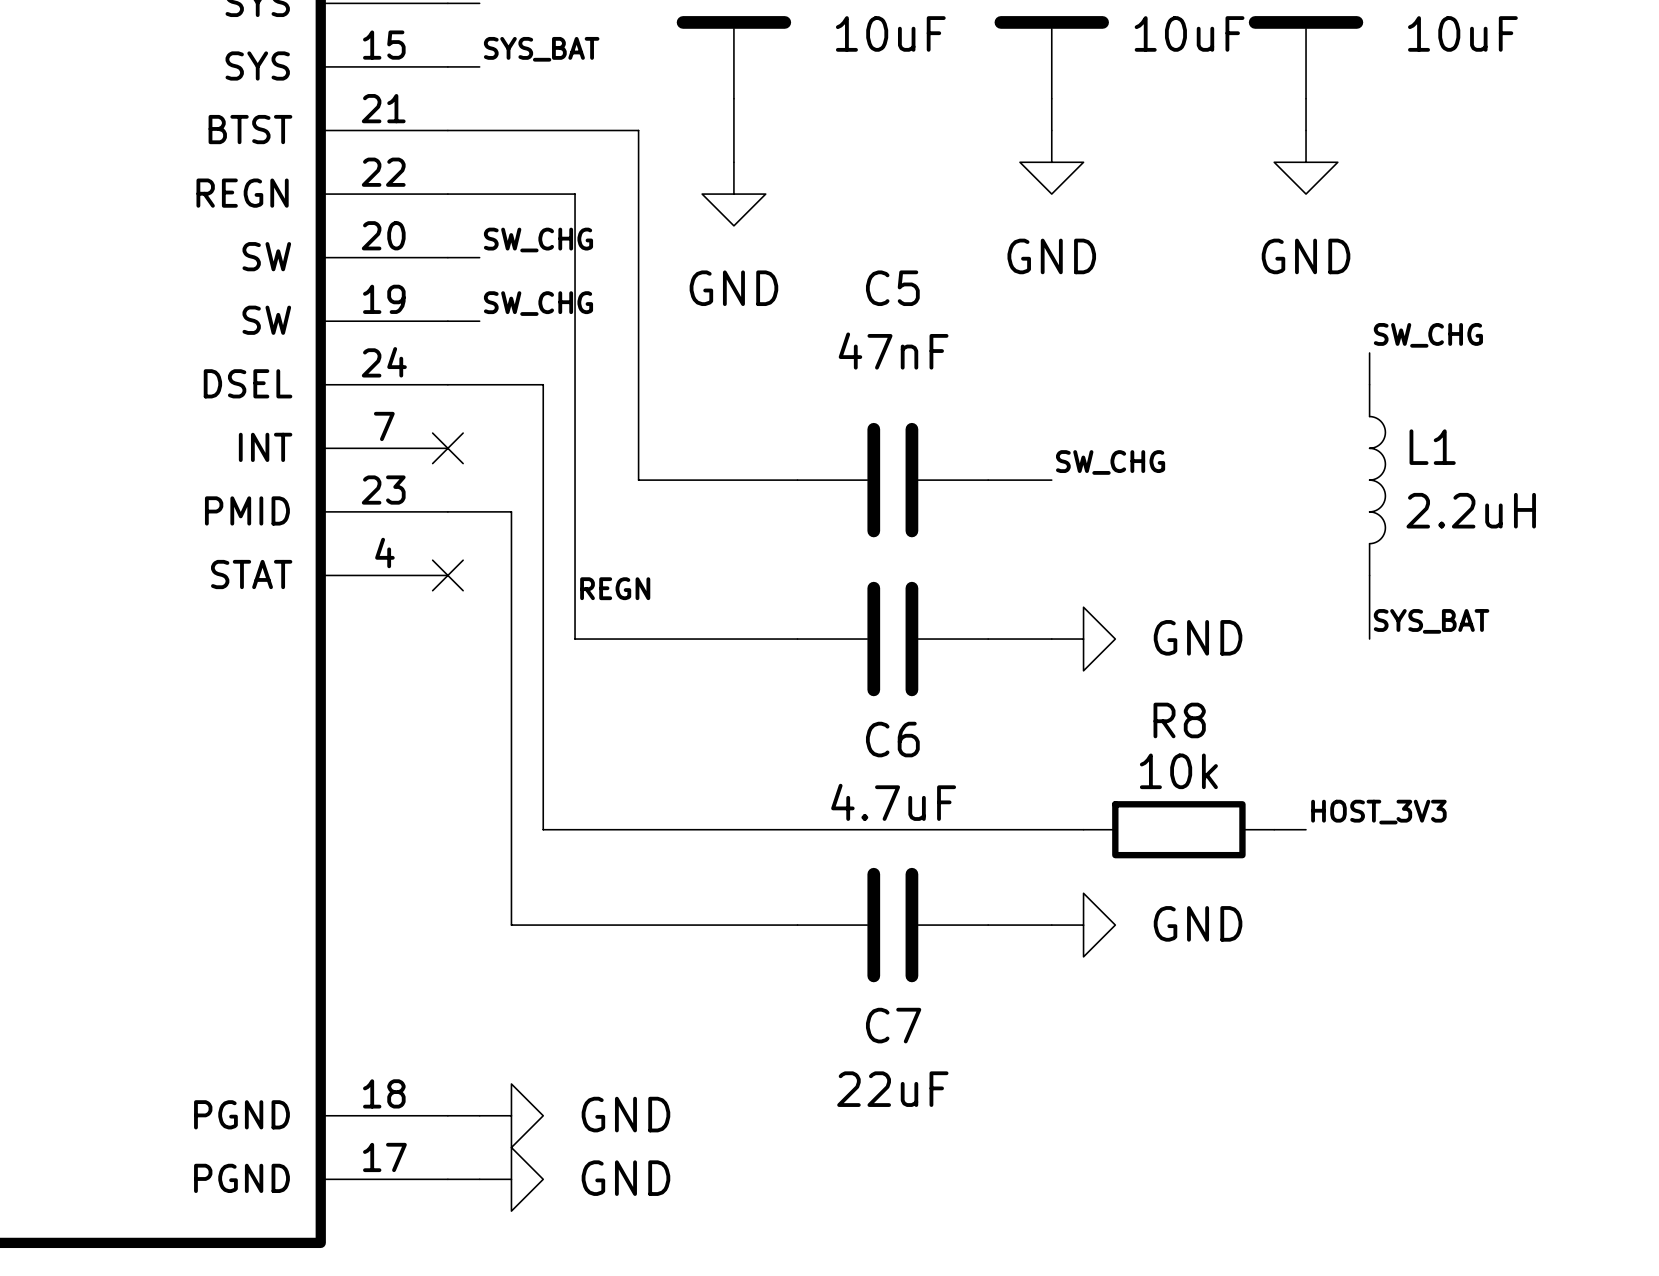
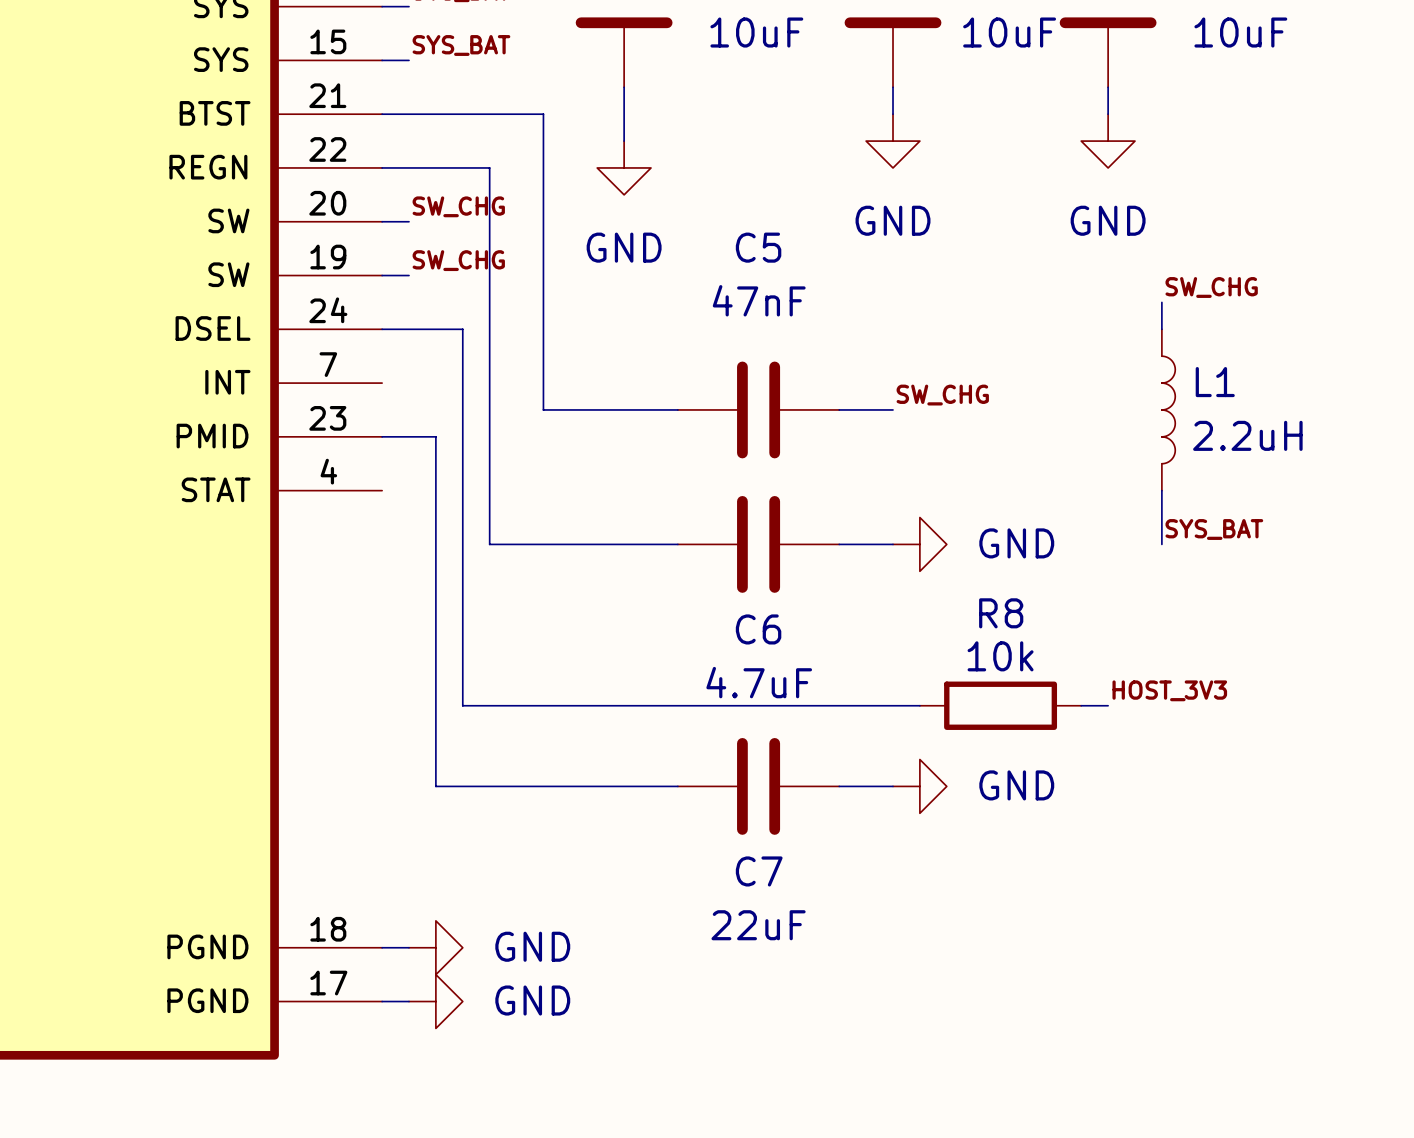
no-connect mark: (447, 448) -> none
no-connect mark: (447, 575) -> none
label: REGN (615, 588) -> none

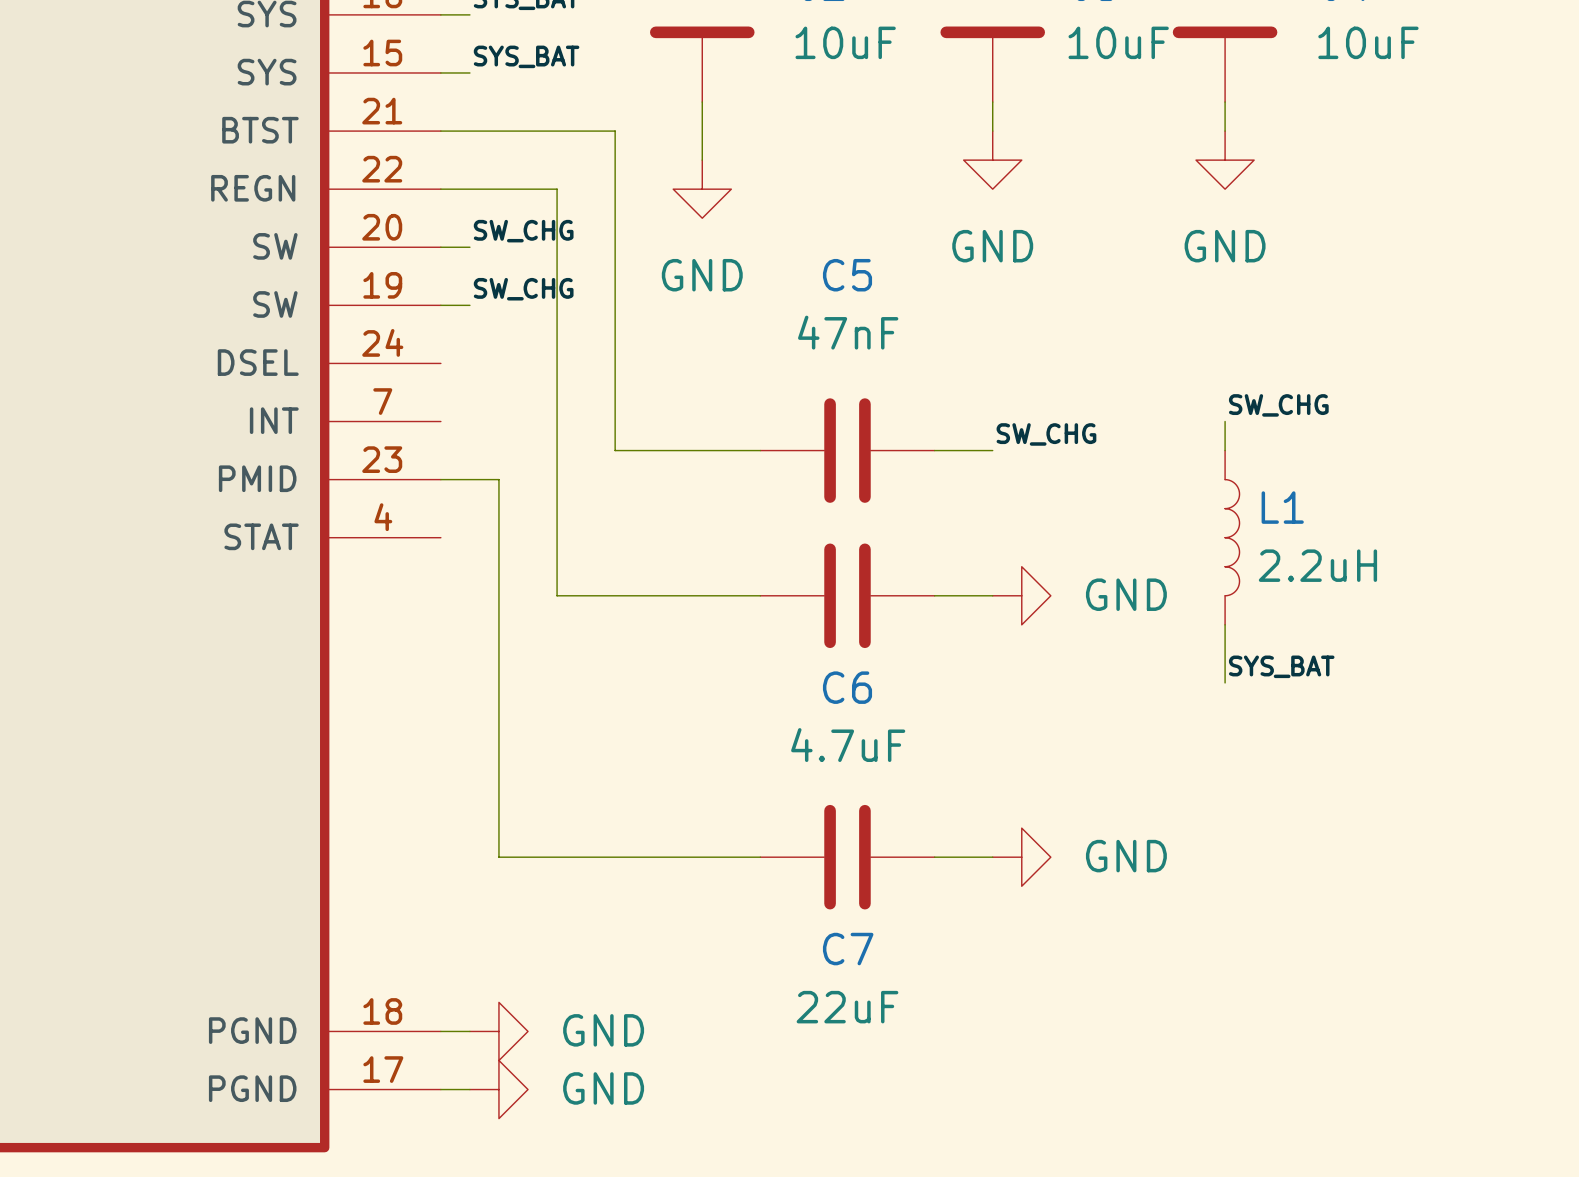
label position: SW_CHG (1211, 287) -> SW_CHG (1278, 405)
wire: (1161, 302) (1161, 329) -> (1225, 421) (1225, 450)
wire: (382, 329) (462, 329) (462, 705) (919, 705) -> none
L1 position: (1168, 409) -> (1232, 537)
wire: (1161, 490) (1161, 544) -> (1225, 624) (1225, 682)
label position: SYS_BAT (1214, 529) -> SYS_BAT (1281, 666)
label: HOST_3V3 (1169, 690) -> none
R8: 10k (1000, 705) -> none
wire: (1081, 705) (1108, 705) -> none

